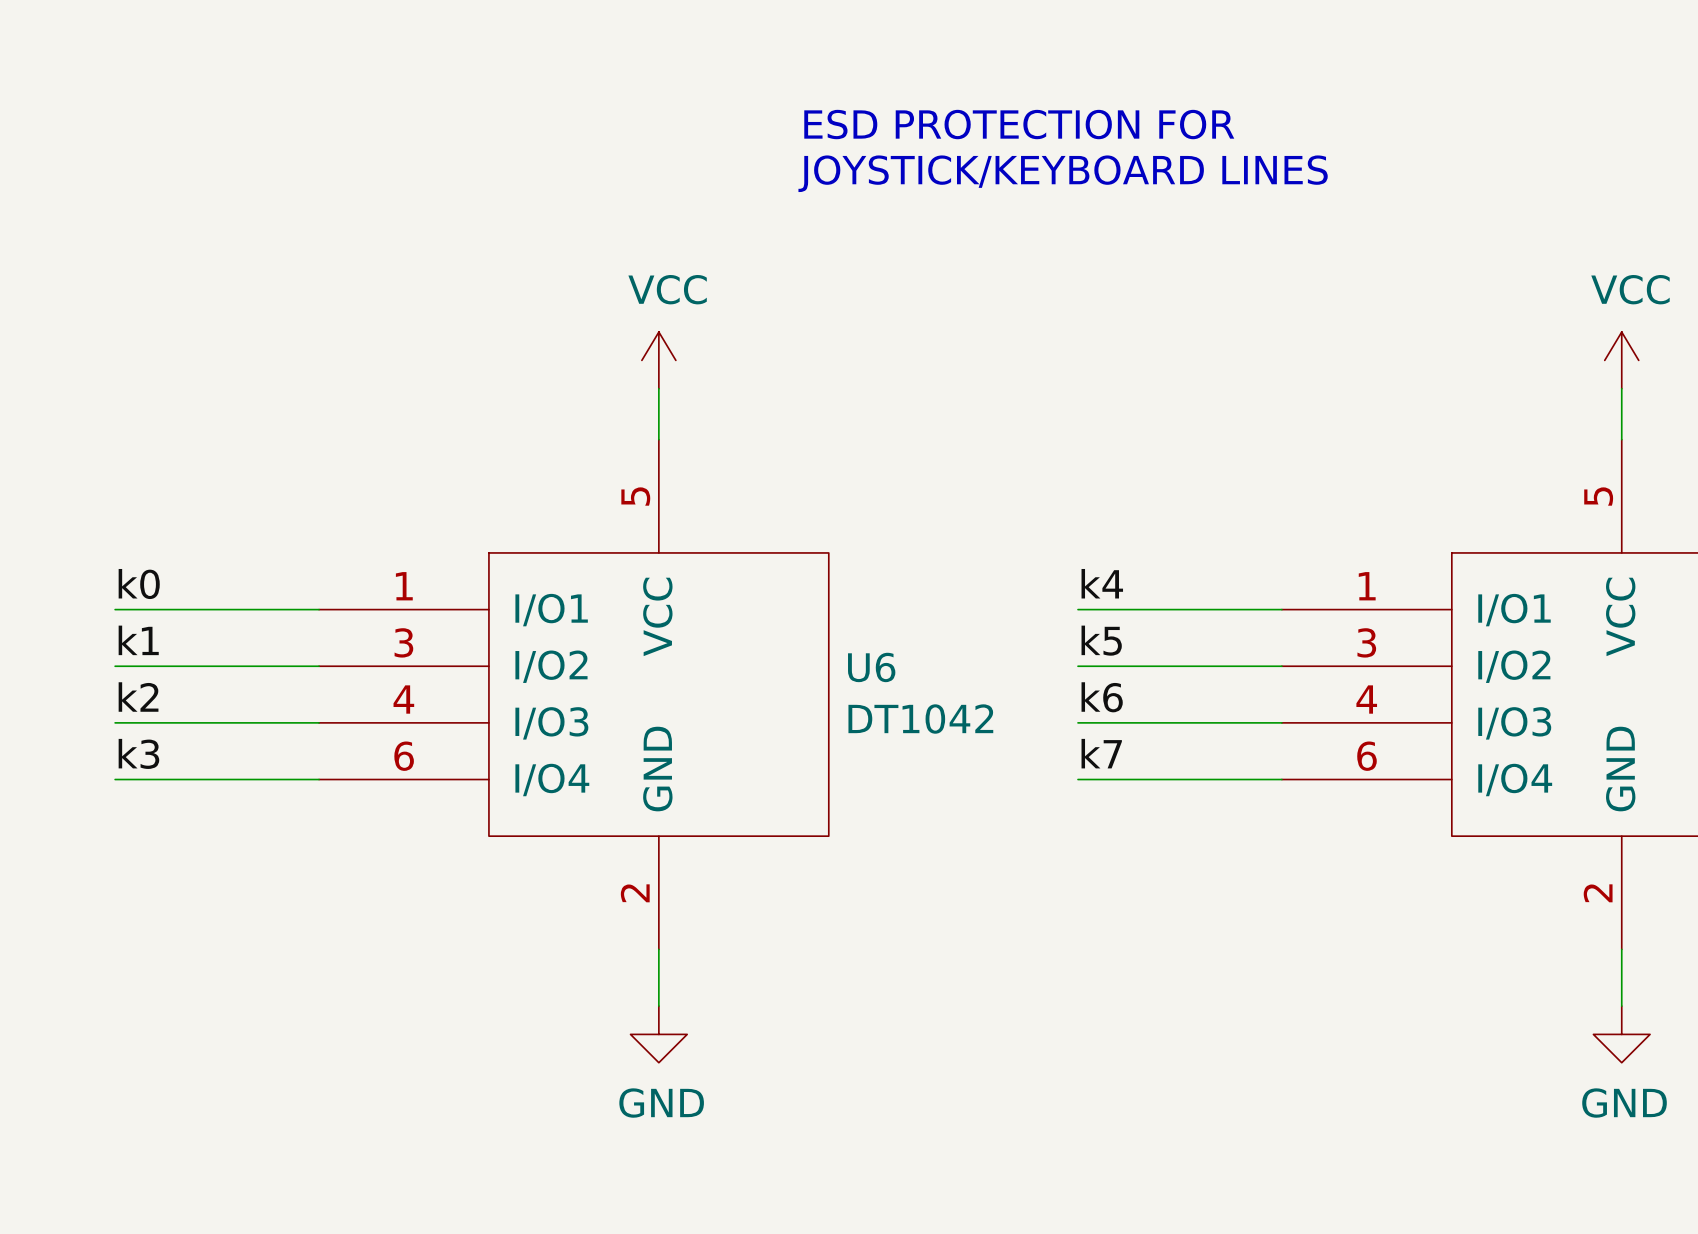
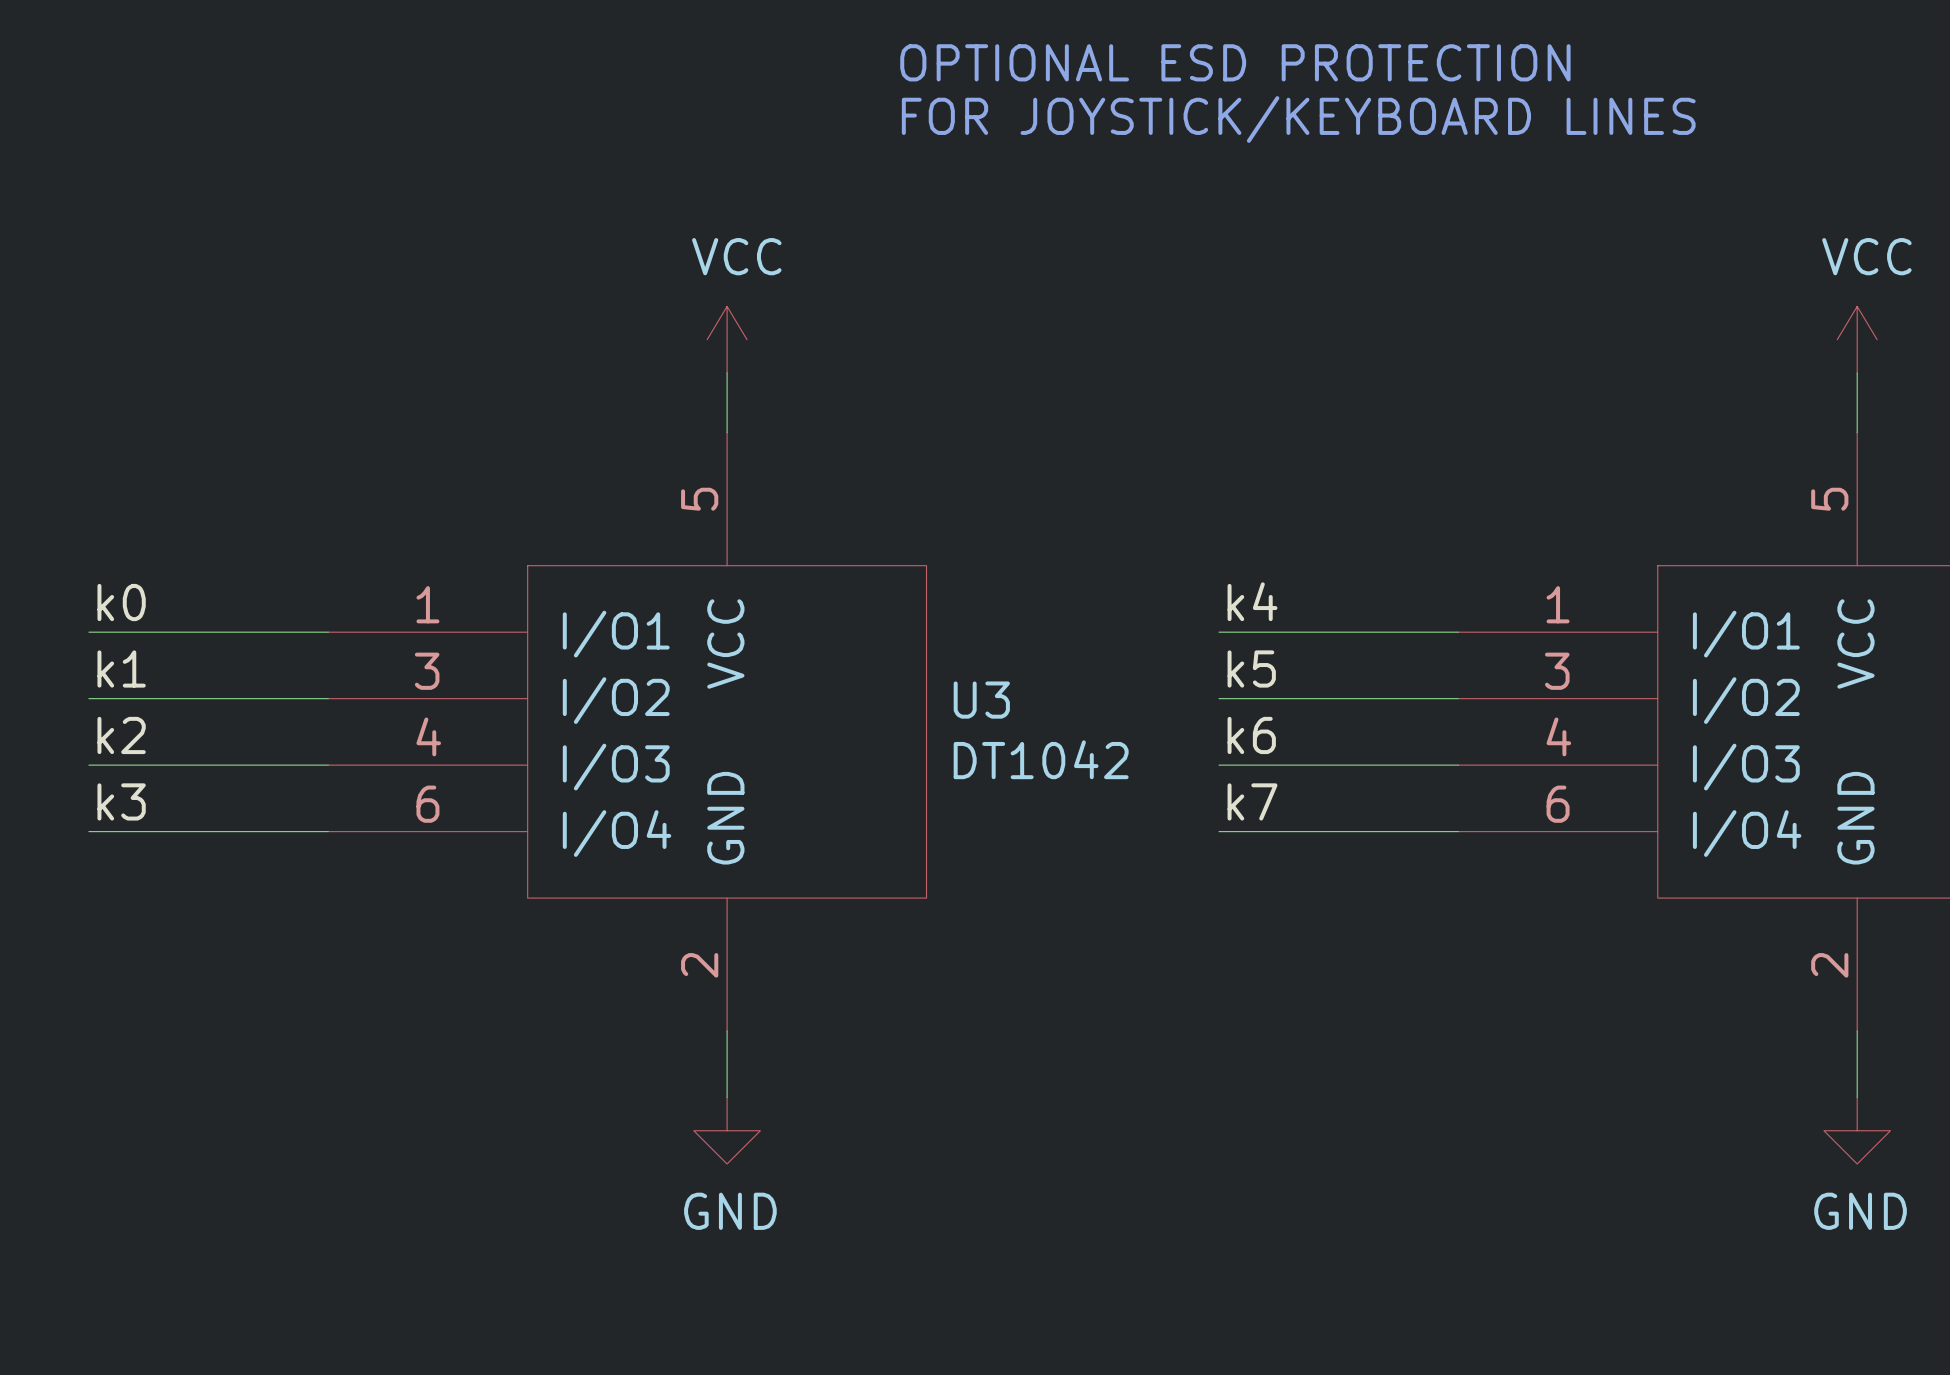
text: ESD PROTECTION FOR (1019, 124) -> OPTIONAL ESD PROTECTION (1235, 62)
text: JOYSTICK/KEYBOARD LINES (1063, 173) -> FOR JOYSTICK/KEYBOARD LINES (1298, 119)
U6 name: U6 (871, 667) -> U3 (981, 700)

